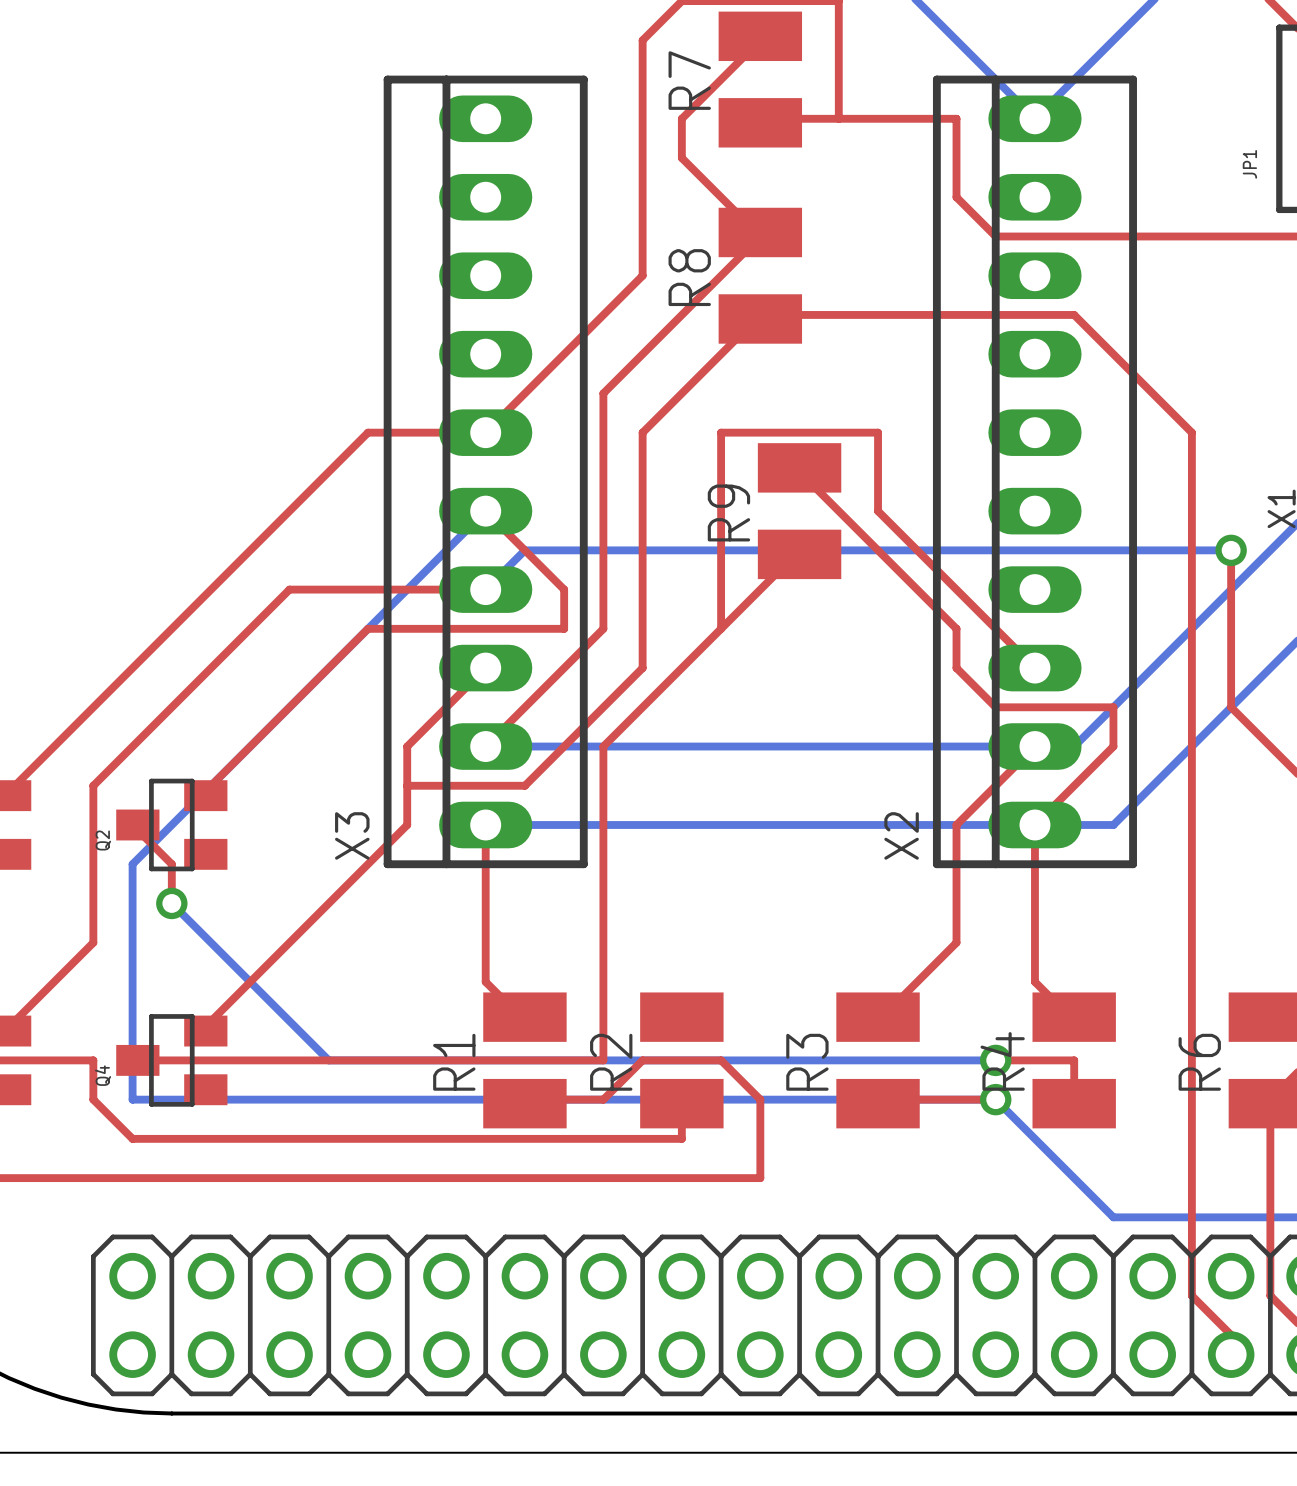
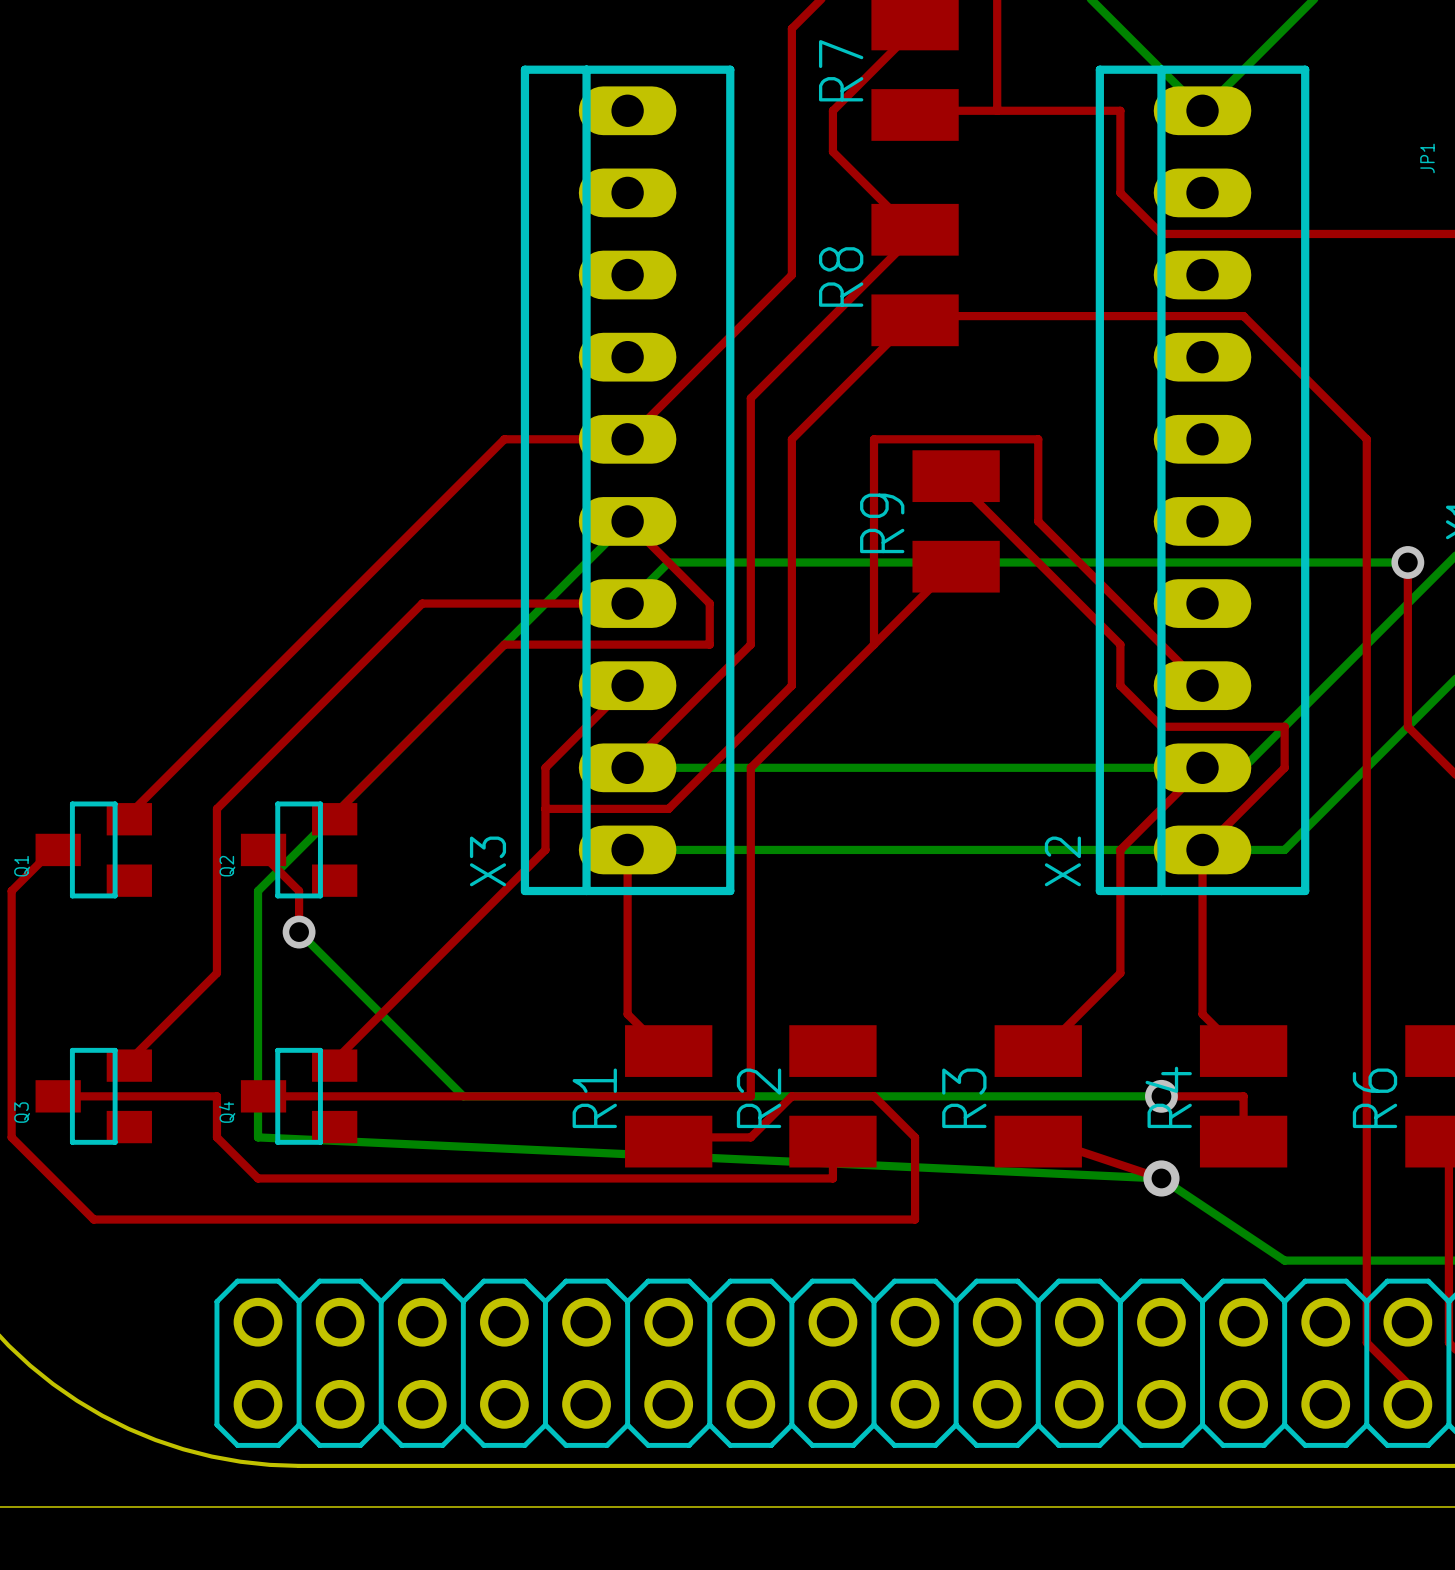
bottom track: (132, 1099) (995, 1099) (1113, 1217) -> (258, 1137) (1161, 1178) (1284, 1260)
top track: (878, 1099) (995, 1099) -> (1038, 1137) (1161, 1178)
via: (995, 1099) -> none
via: none -> (1161, 1178)

